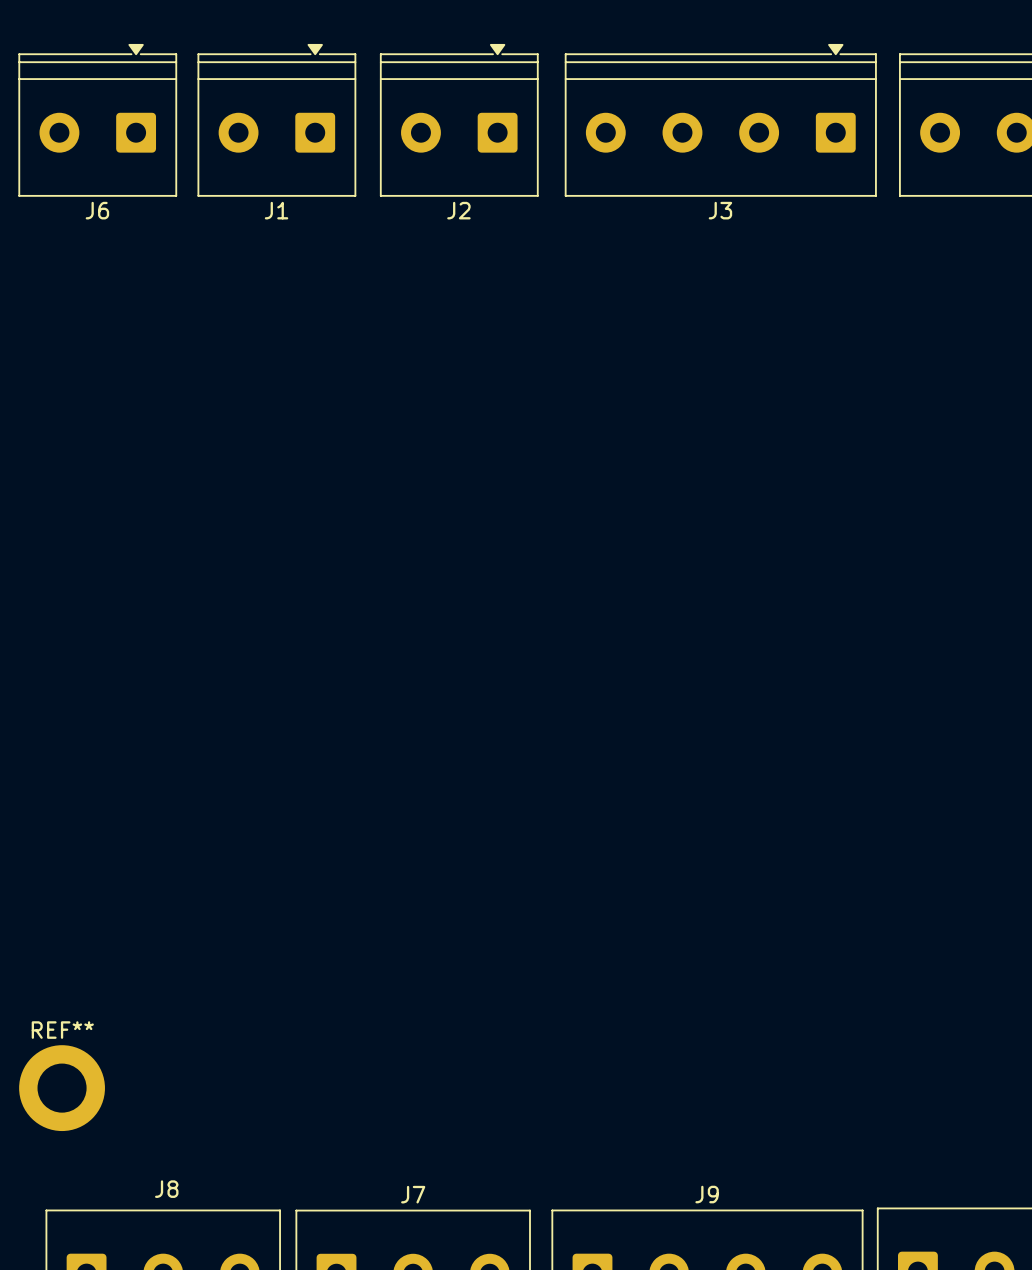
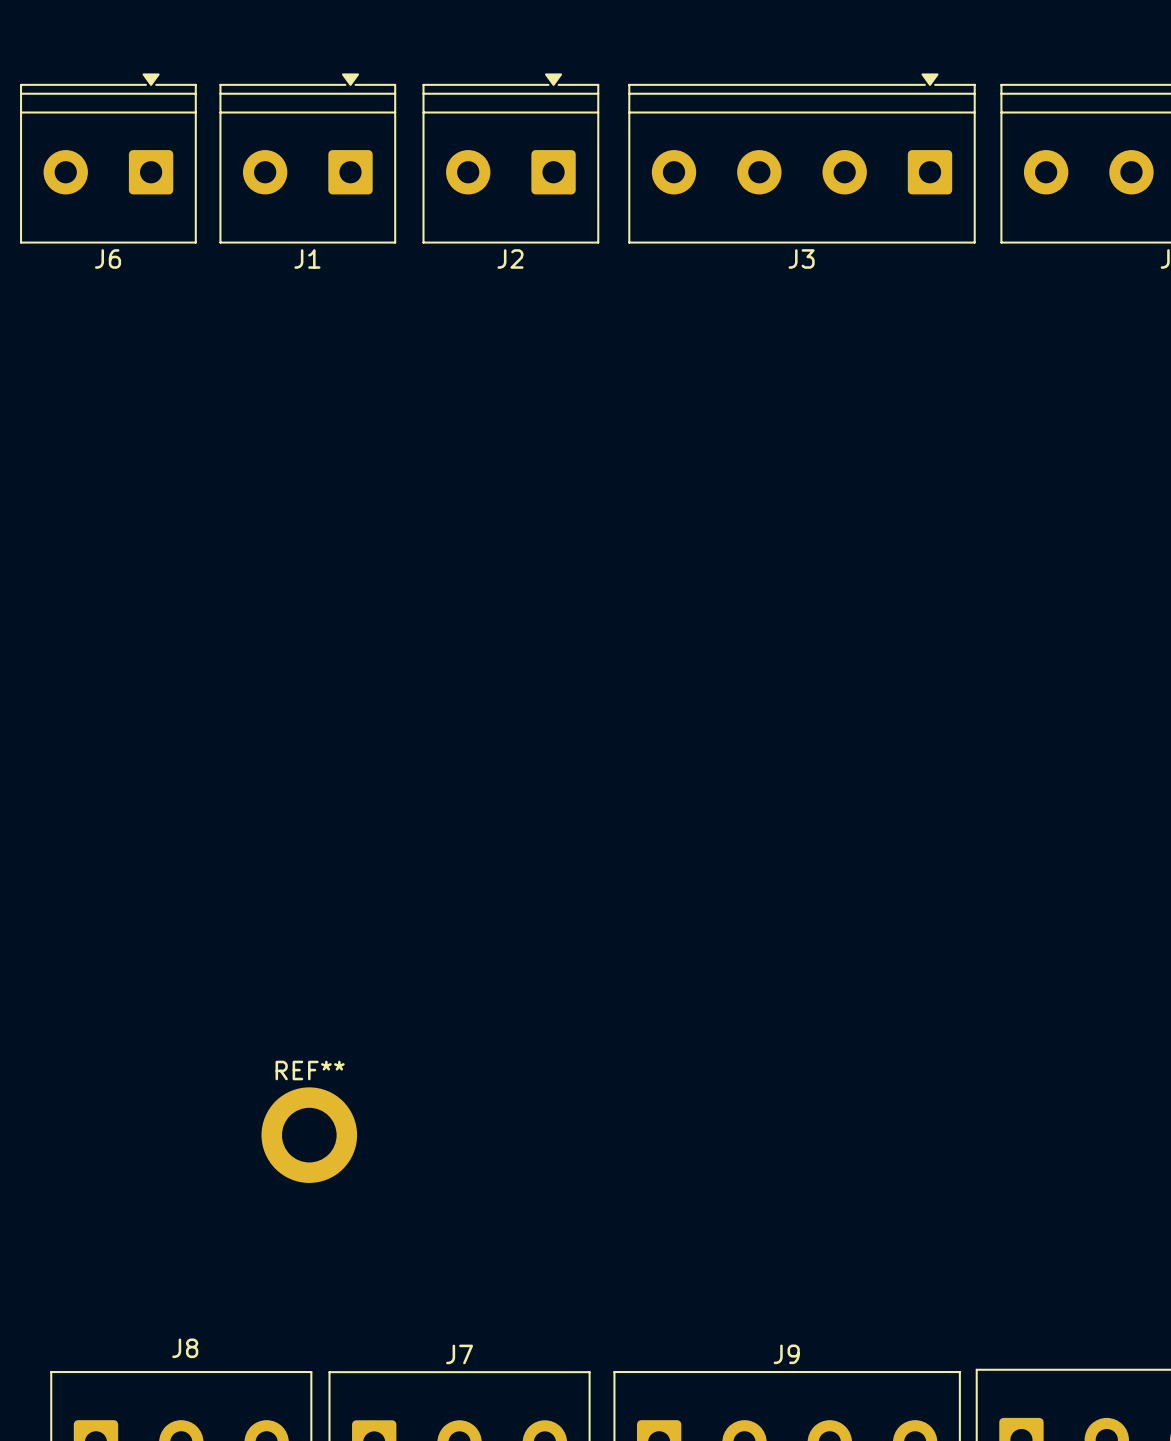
REF** position: (62, 1088) -> (309, 1135)

